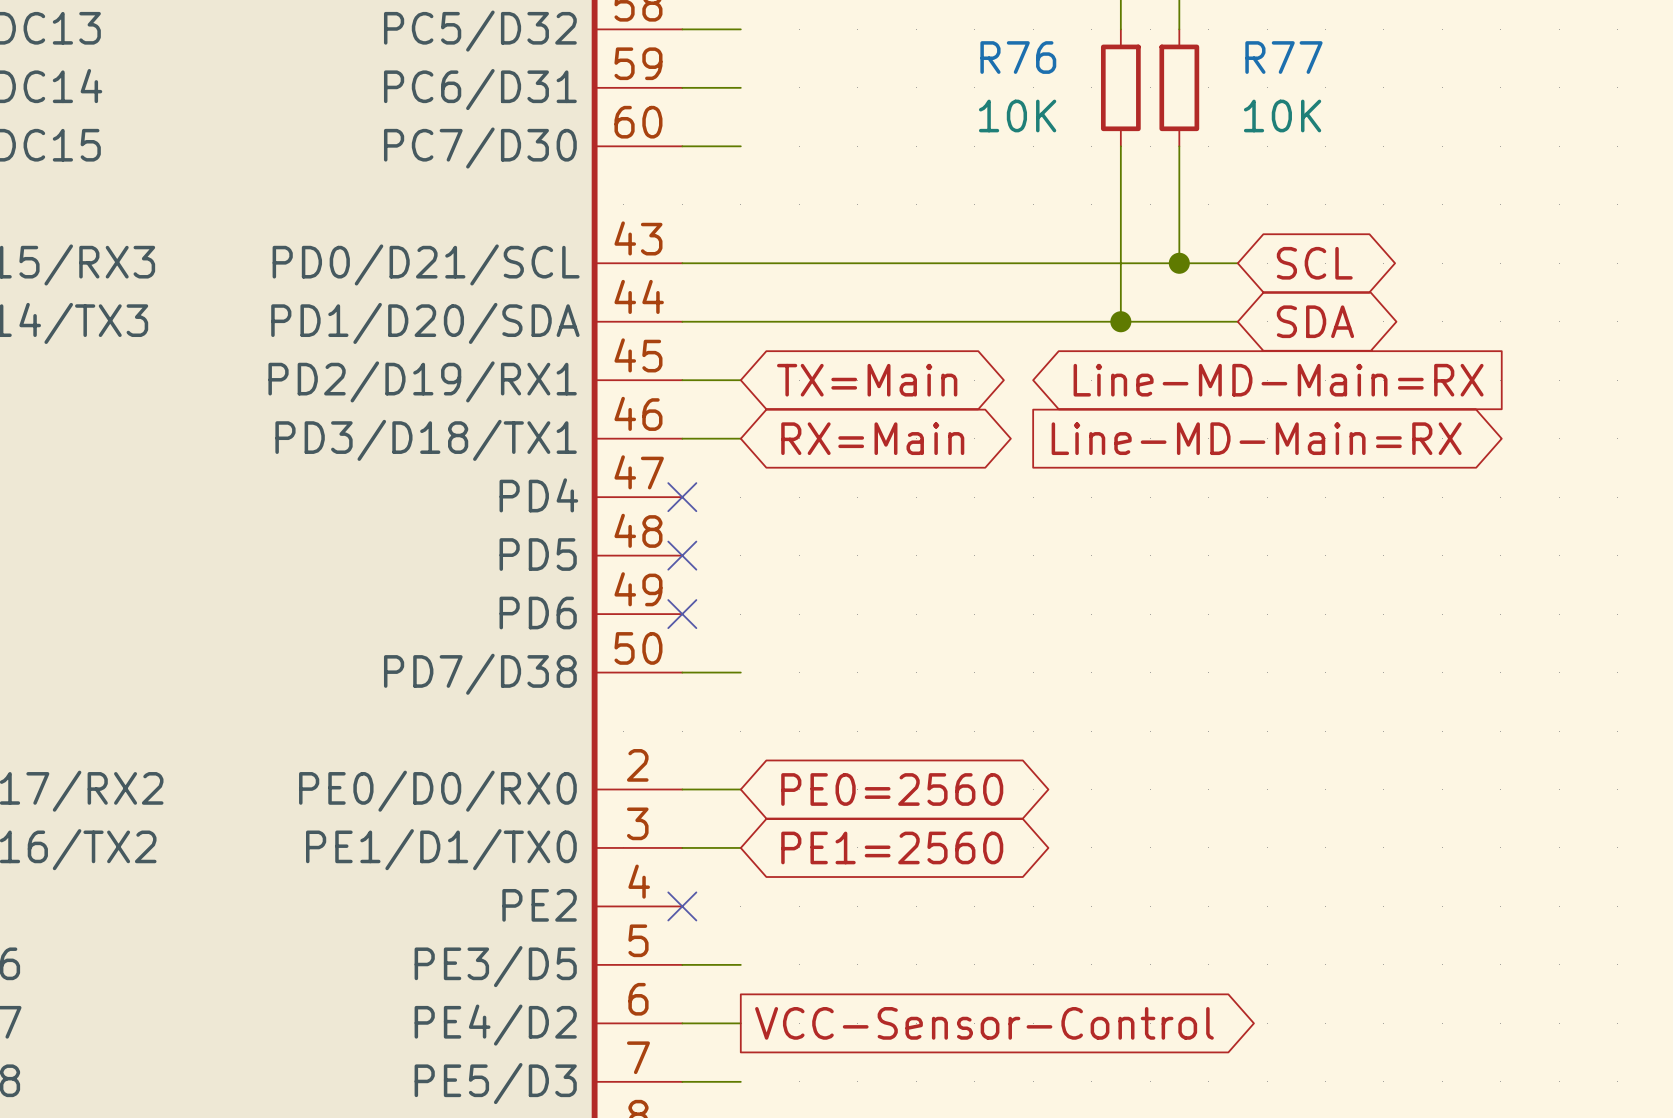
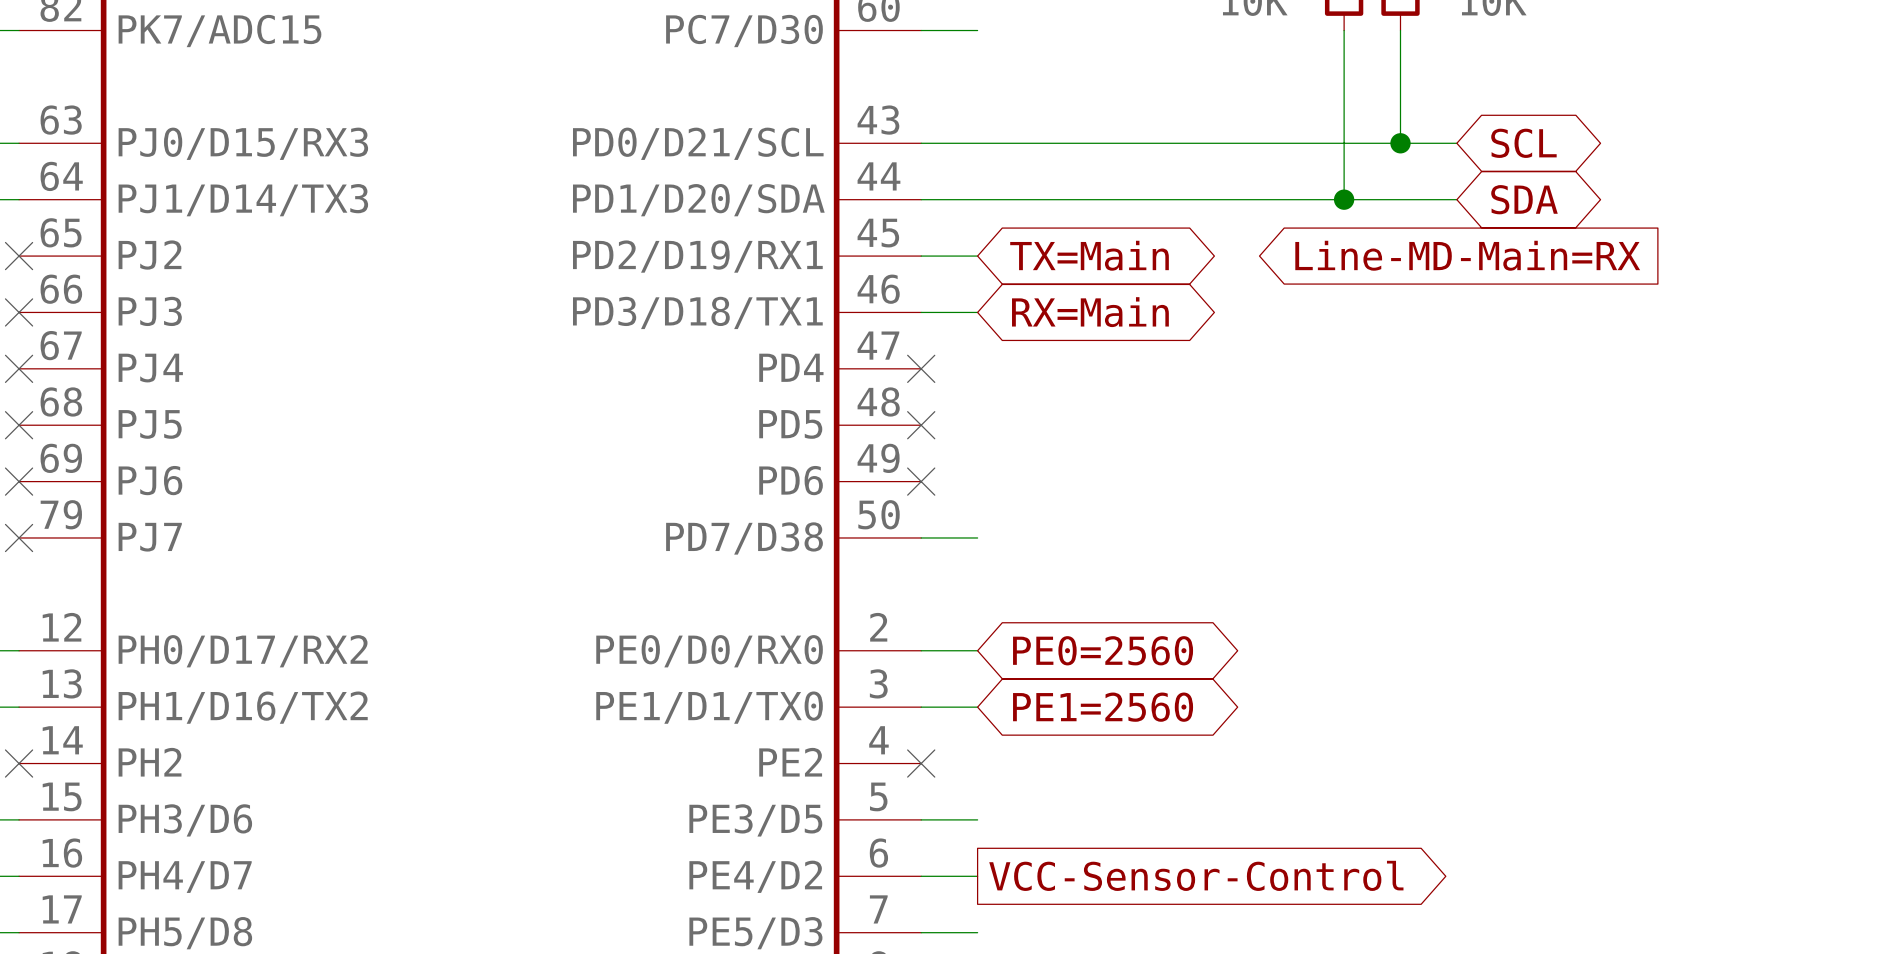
global label: Line-MD-Main=RX (1256, 438) -> none

